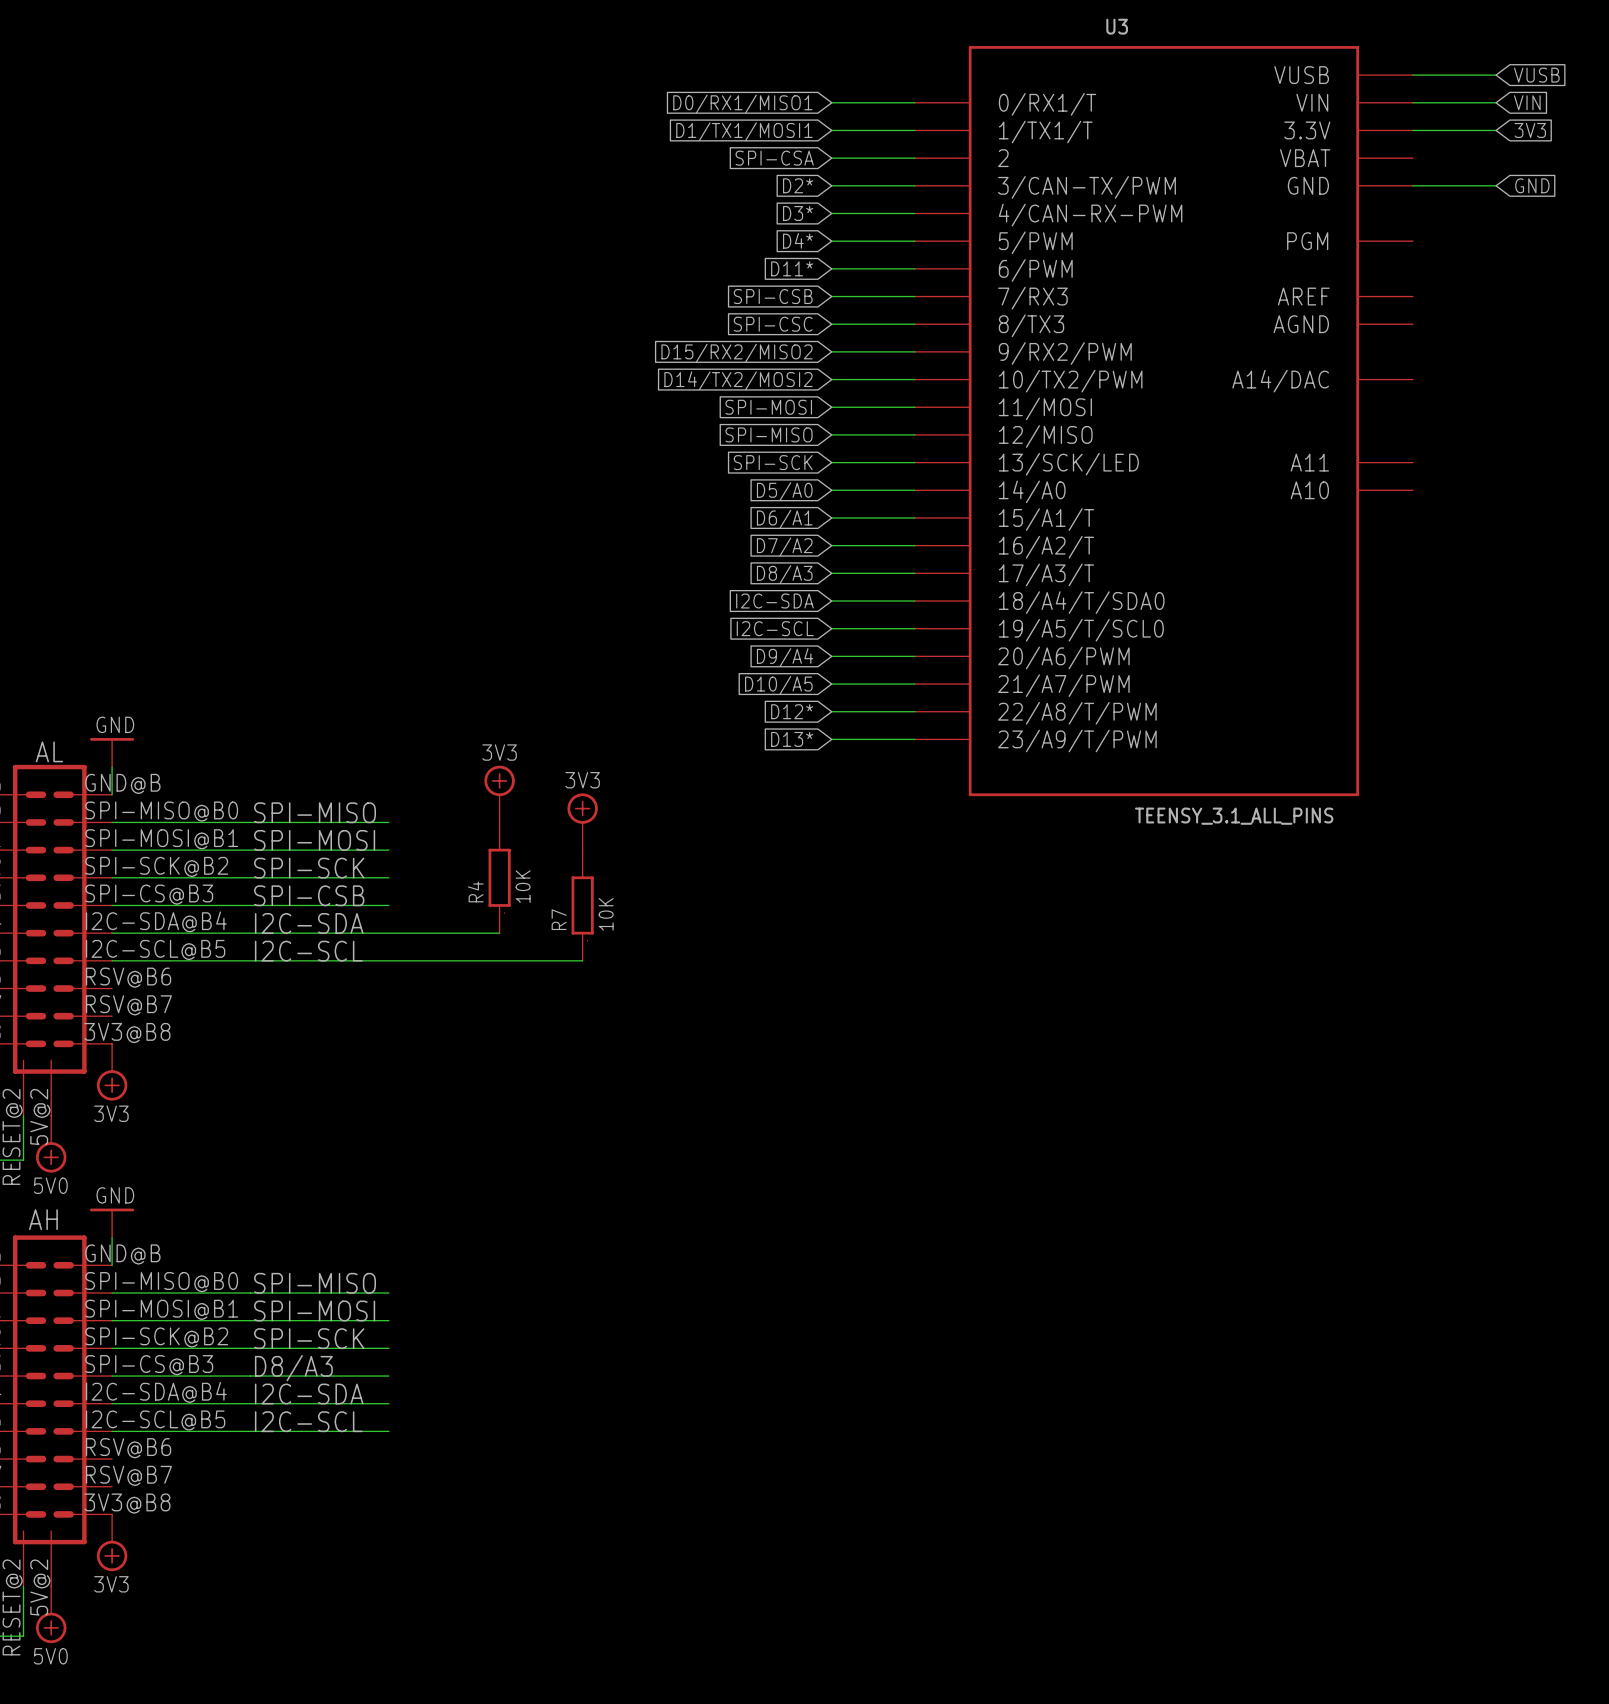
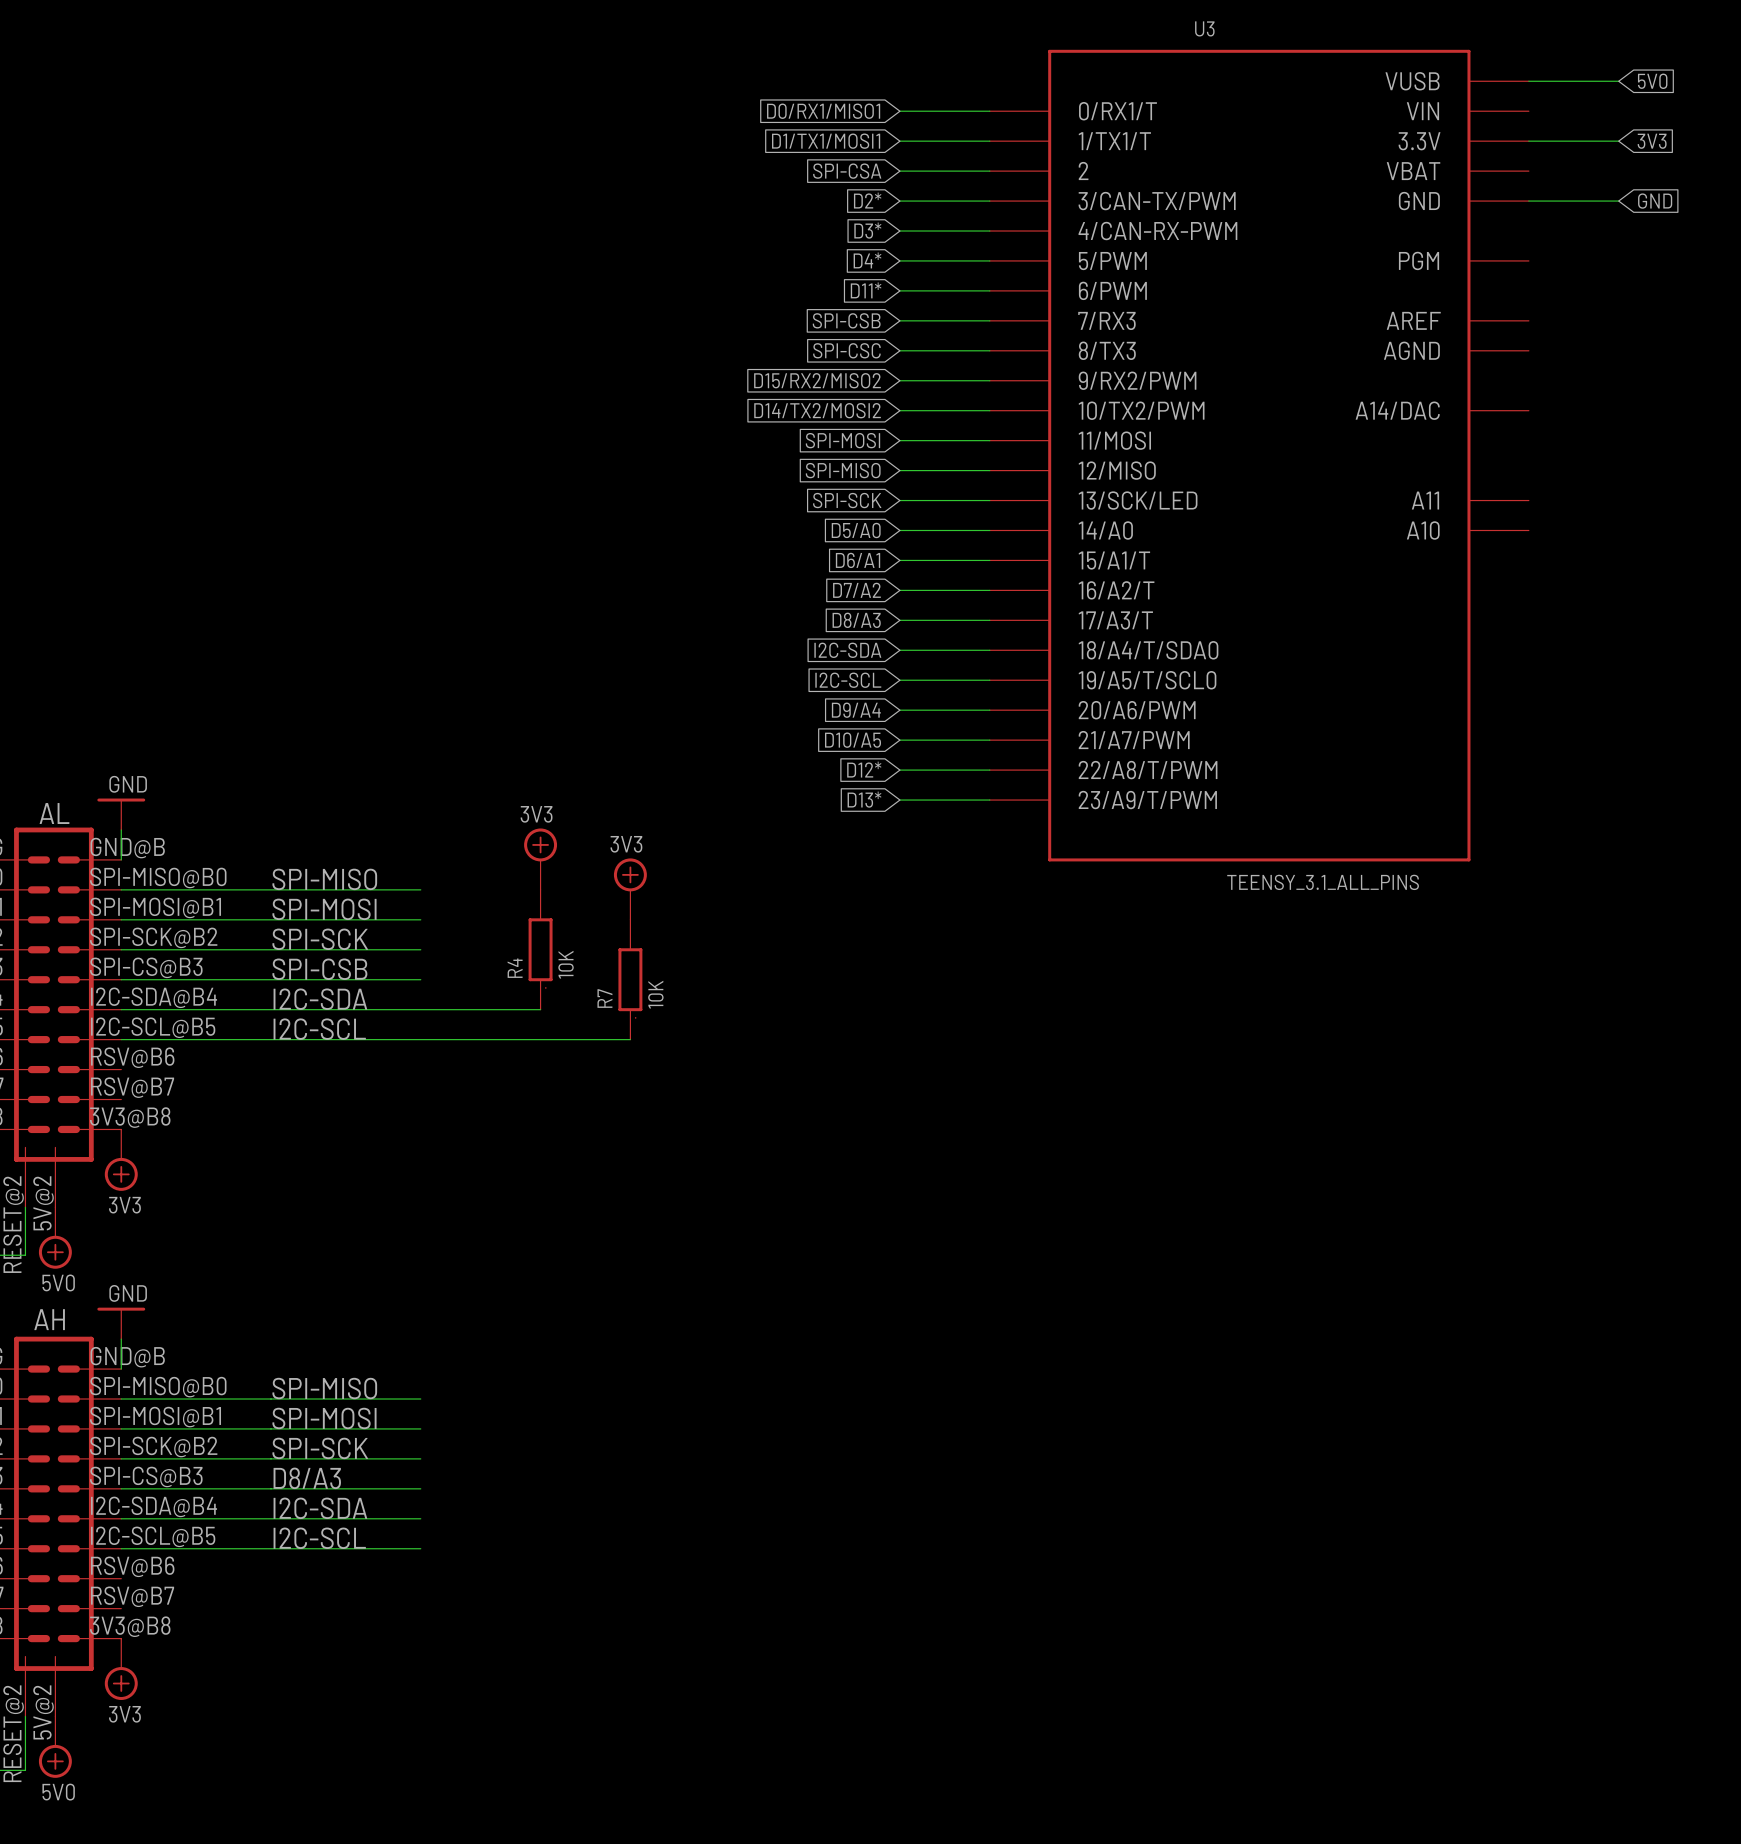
global label: VUSB (1536, 75) -> 5V0 (1652, 81)
wire: (1413, 102) (1496, 102) -> none
global label: VIN (1527, 102) -> none

